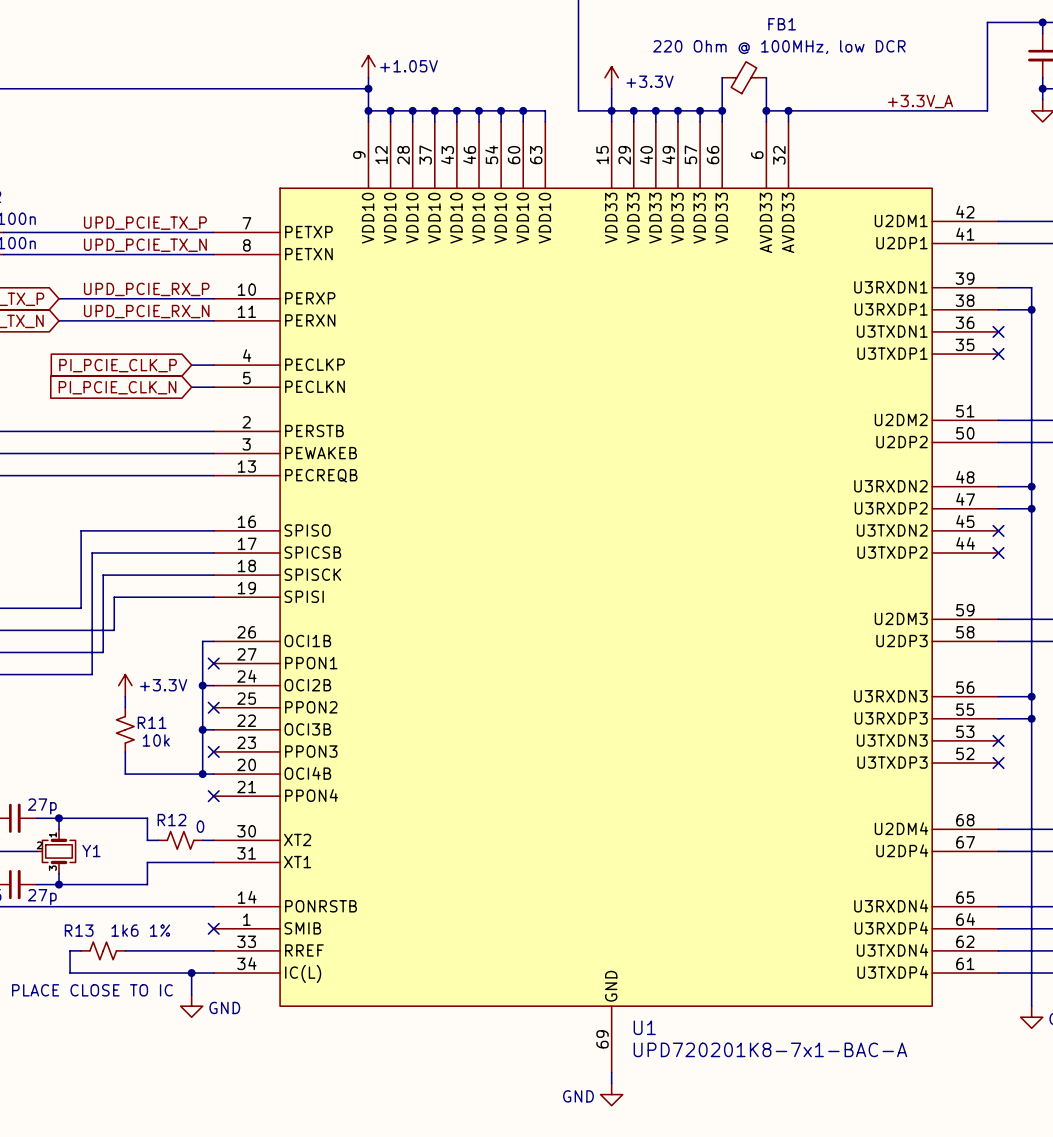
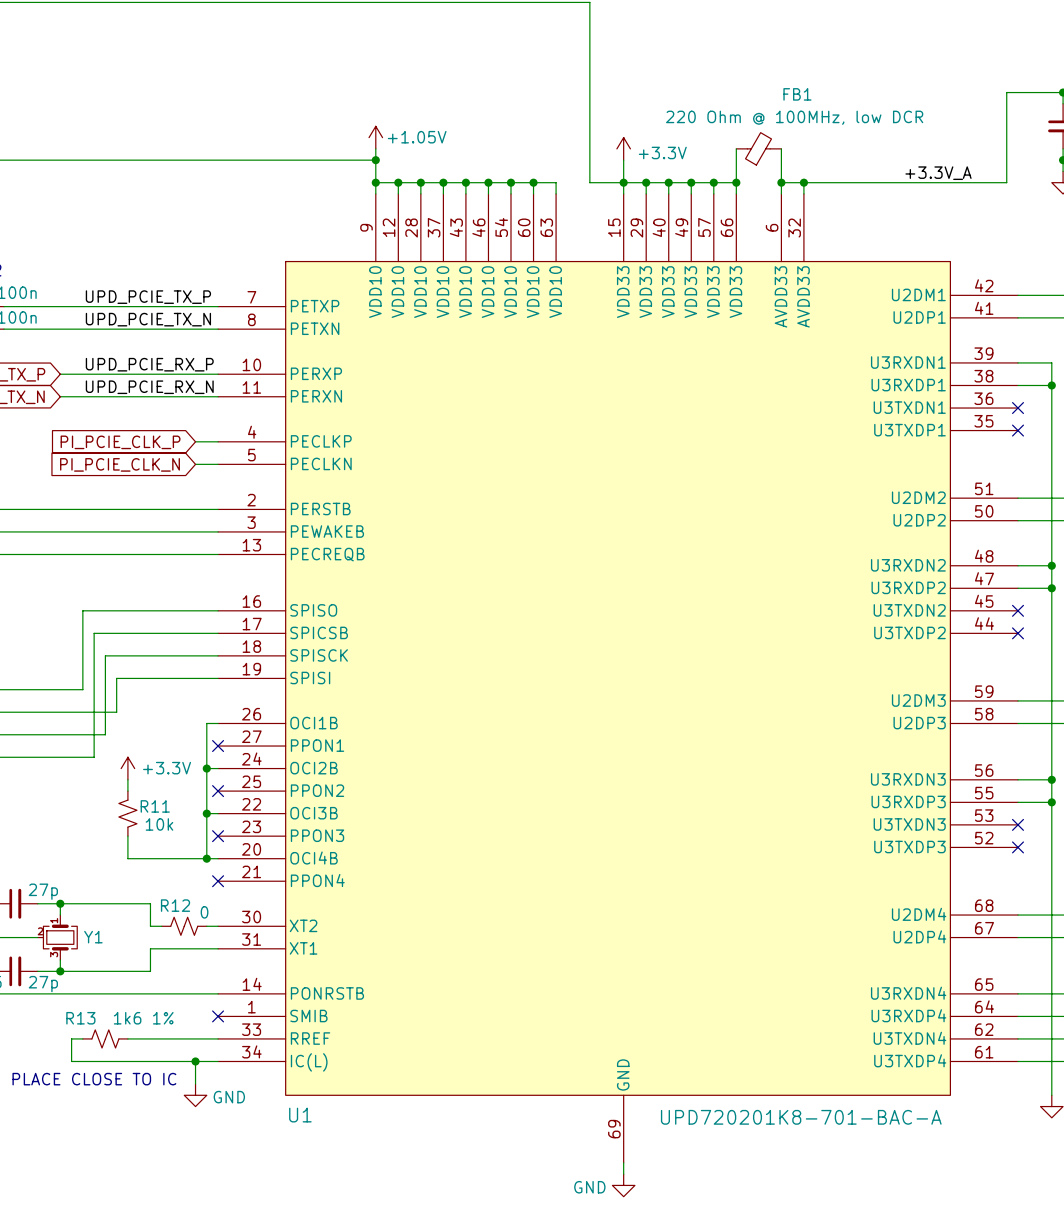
U1 name position: U1 (644, 1027) -> U1 (300, 1115)
U1 value: UPD720201K8-7x1-BAC-A (770, 1049) -> UPD720201K8-701-BAC-A (801, 1117)

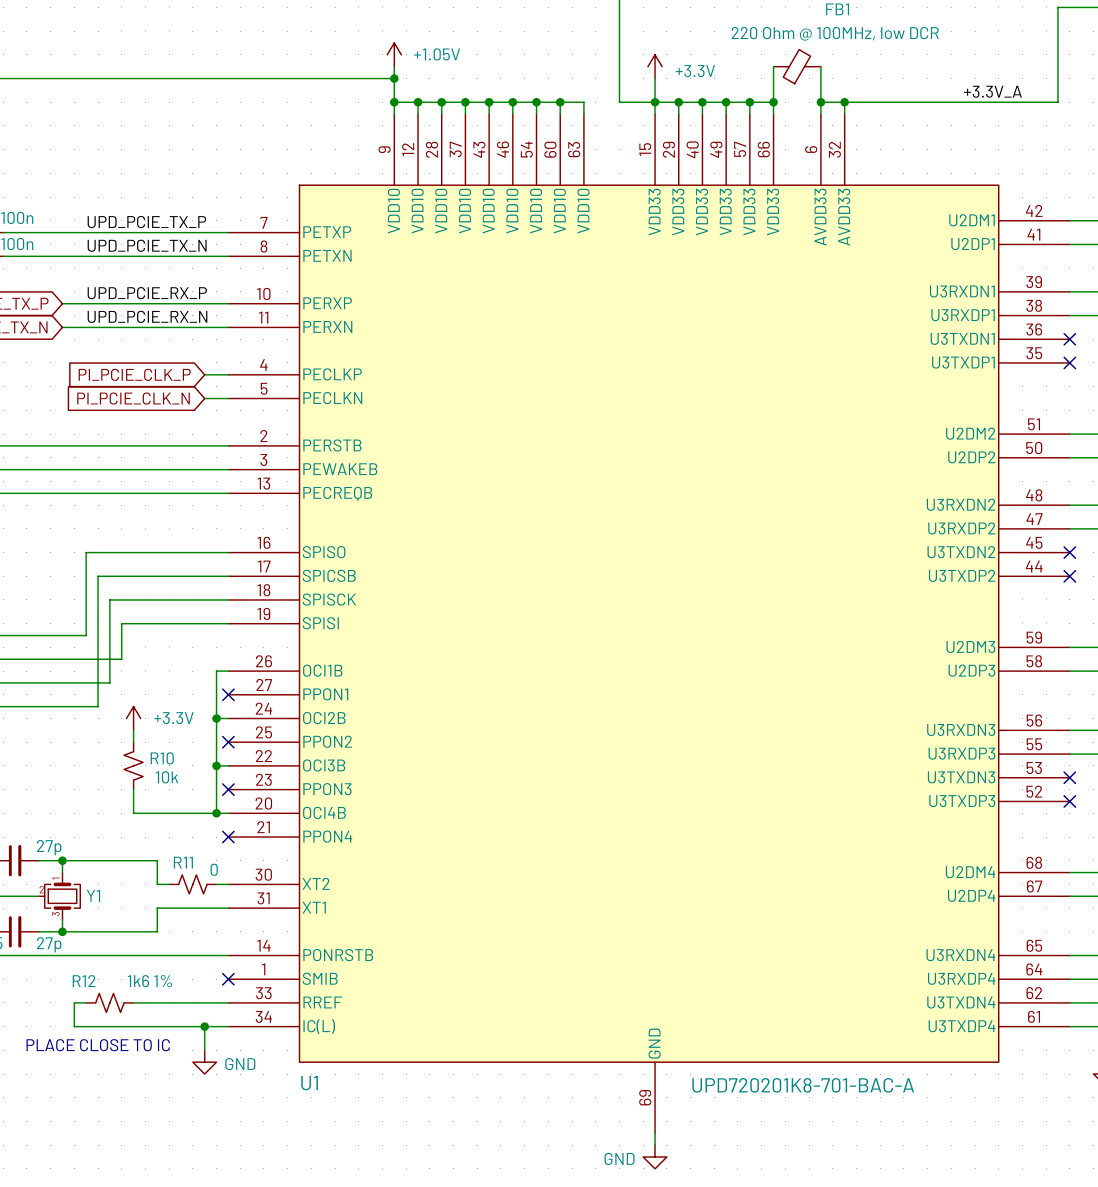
R11 name: R11 (155, 806) -> R10 (162, 758)
R12 name: R12 (175, 905) -> R11 (183, 862)
R13 name: R13 (80, 1018) -> R12 (84, 981)

